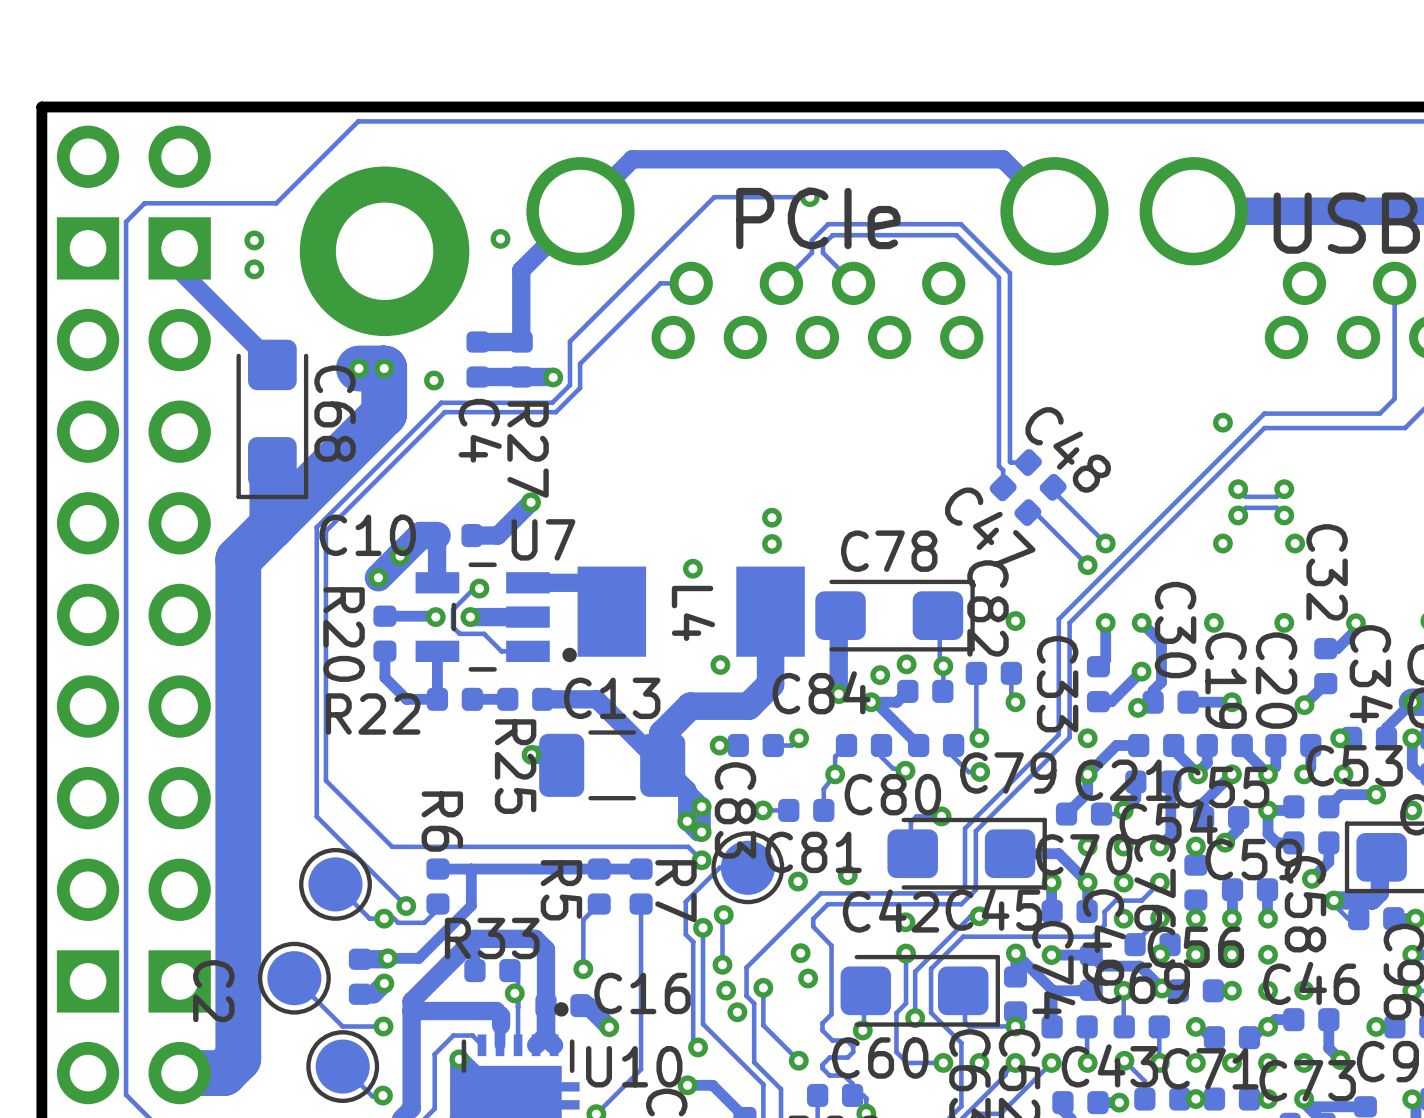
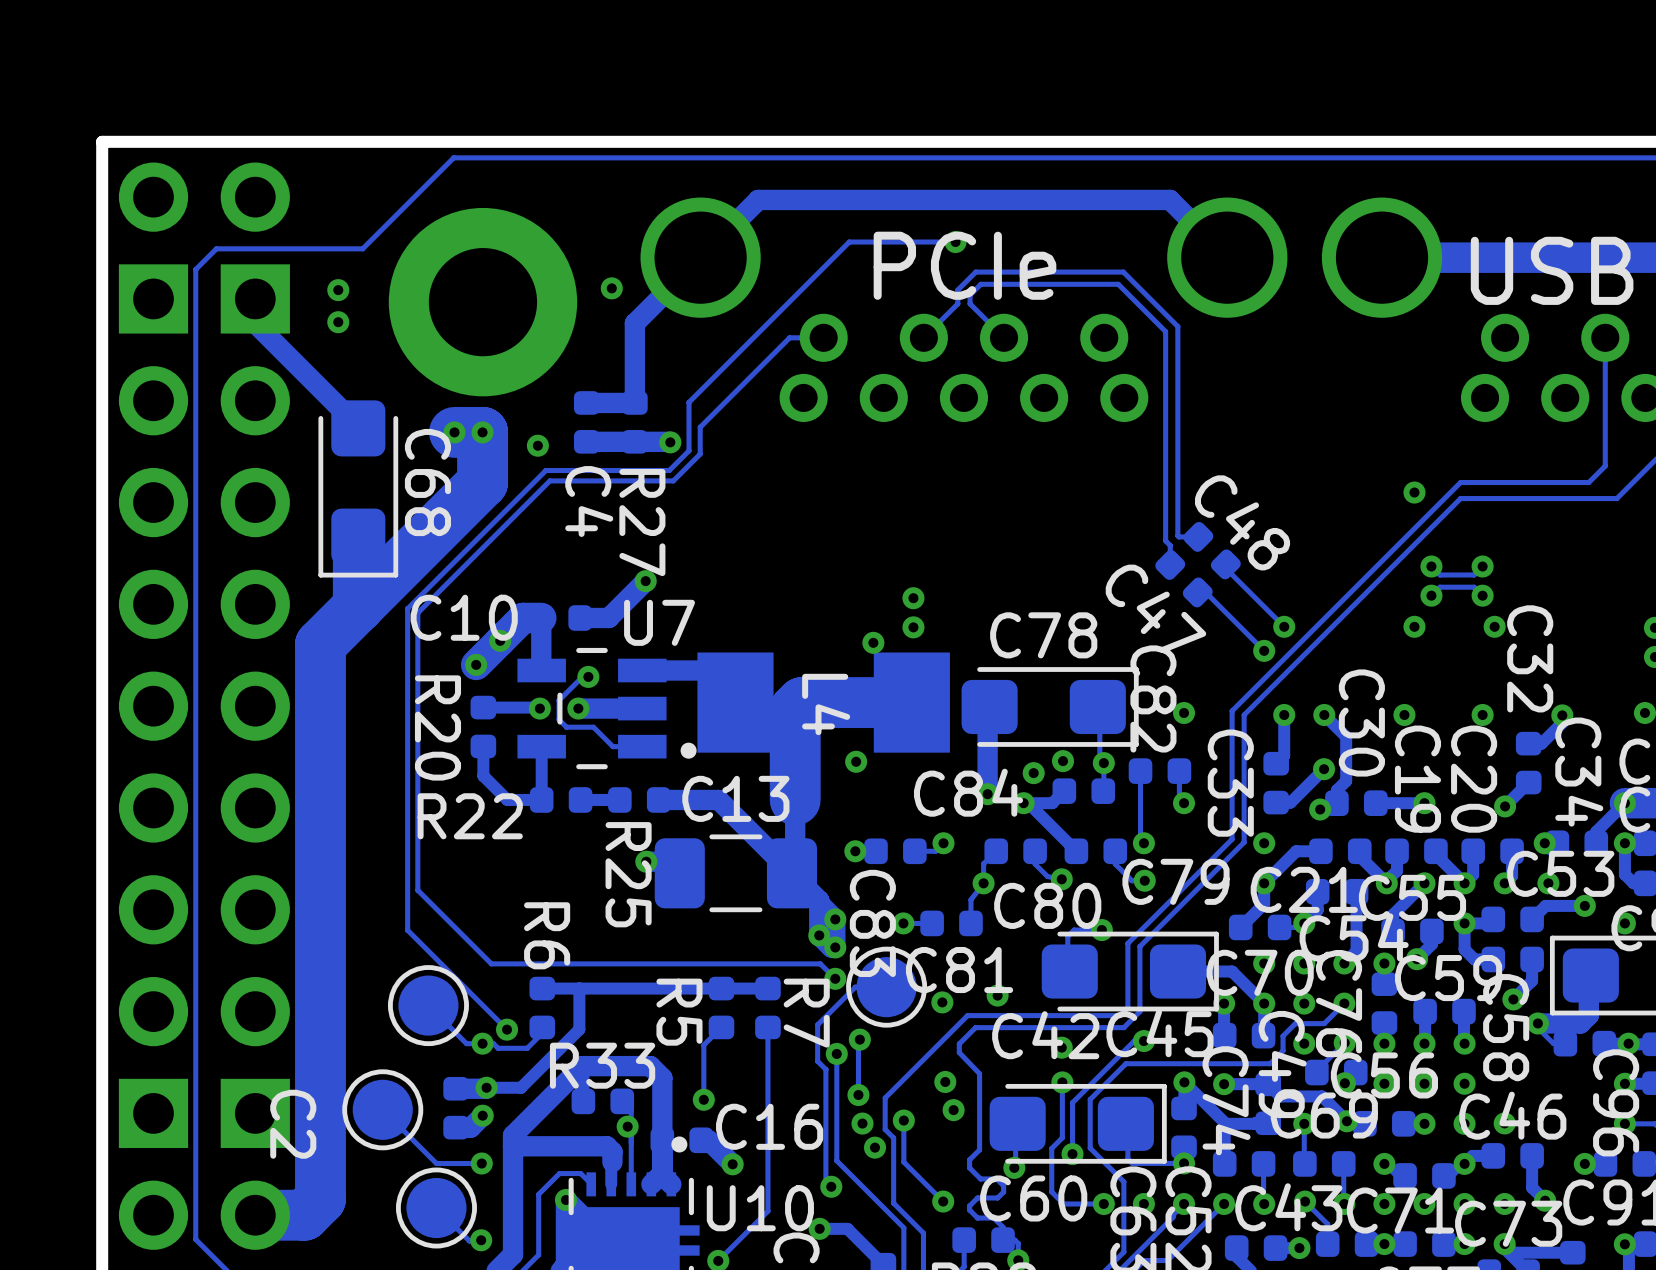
via position: (692, 568) -> (873, 642)
track: (770, 611) (770, 684) (748, 706) (690, 706) (662, 733) (662, 765) -> (911, 702) (802, 702) (795, 709) (795, 870) (792, 873)

